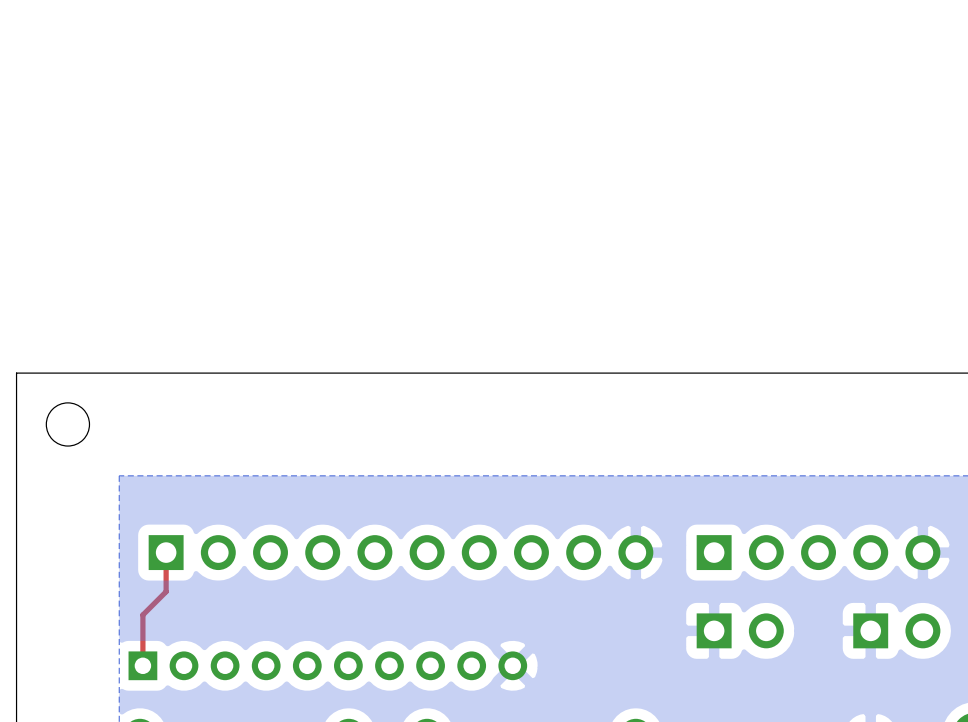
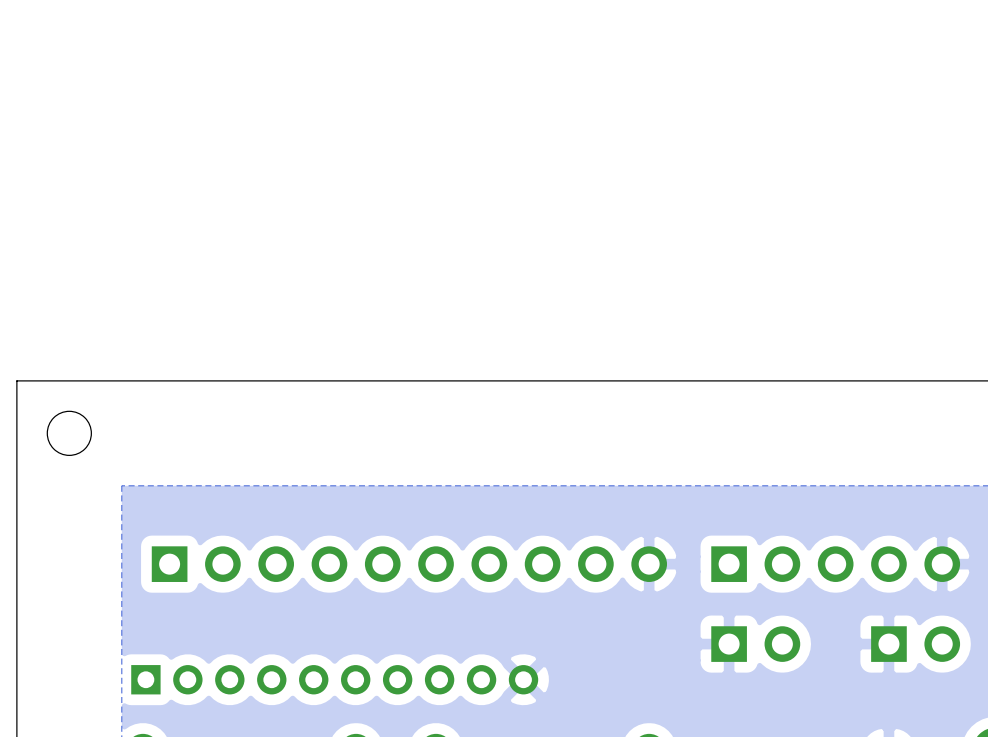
top track: (166, 552) (166, 591) (142, 614) (142, 665) -> none

